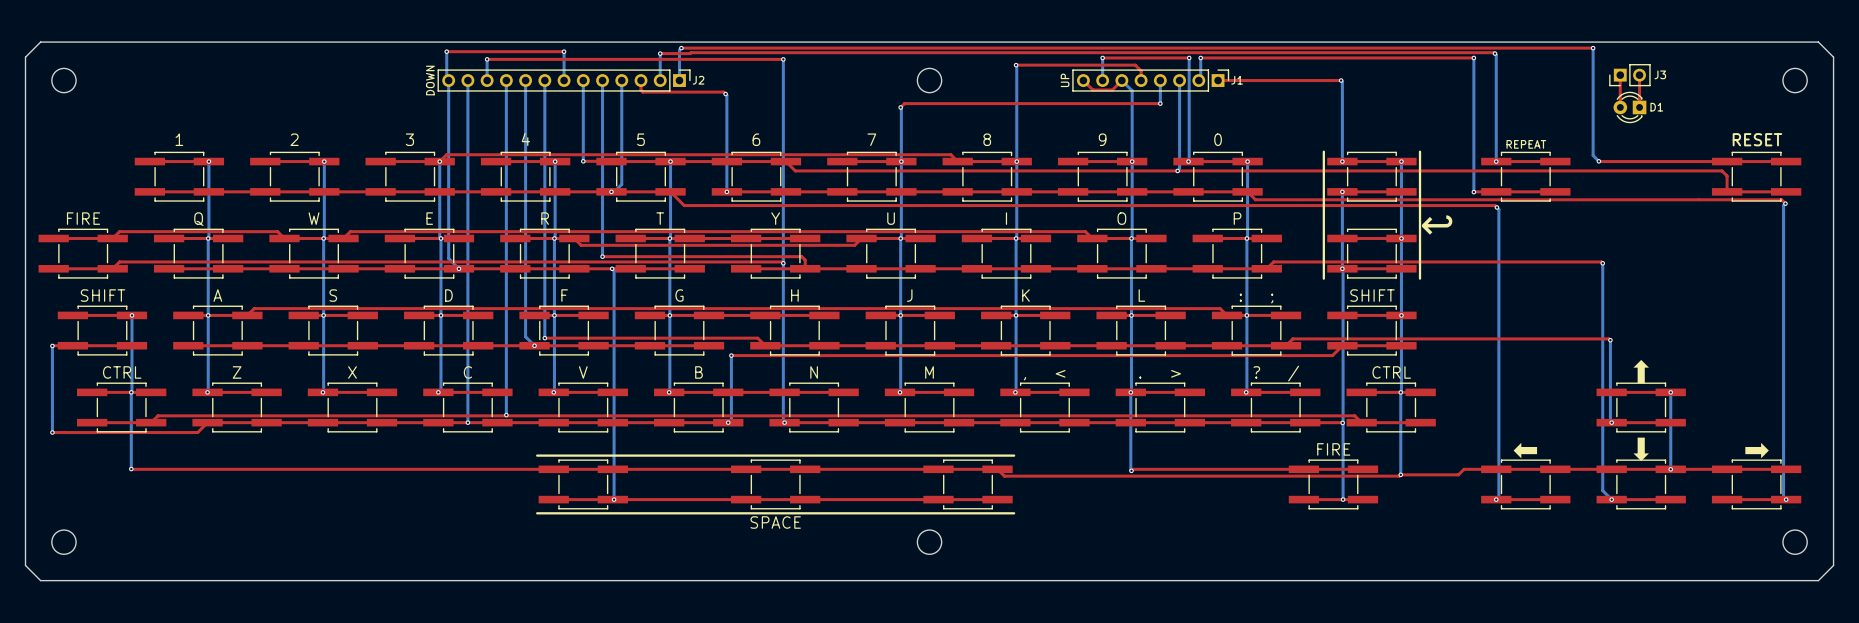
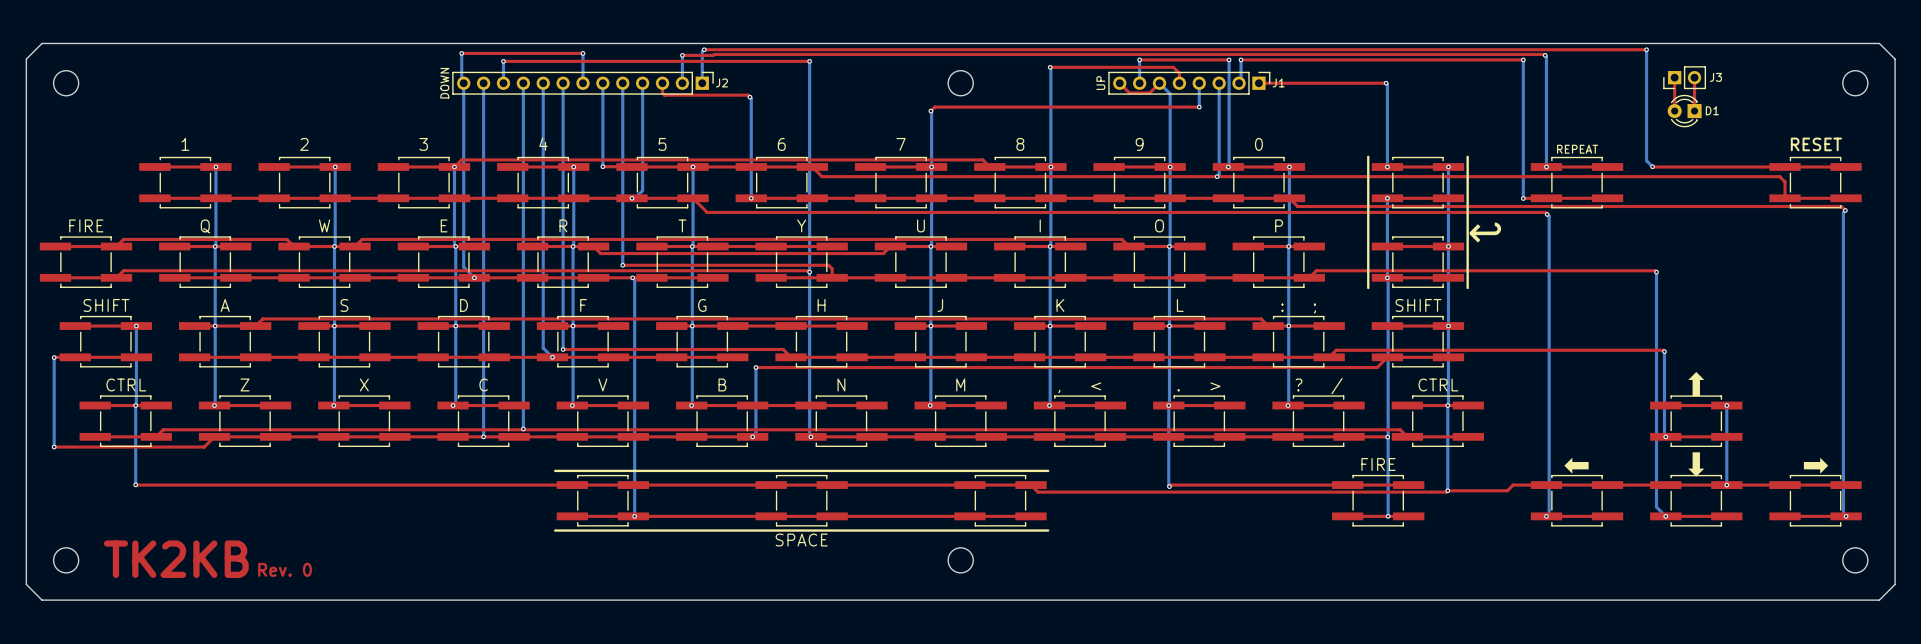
text: none -> TK2KB (176, 559)
text: none -> Rev. 0 (285, 569)

